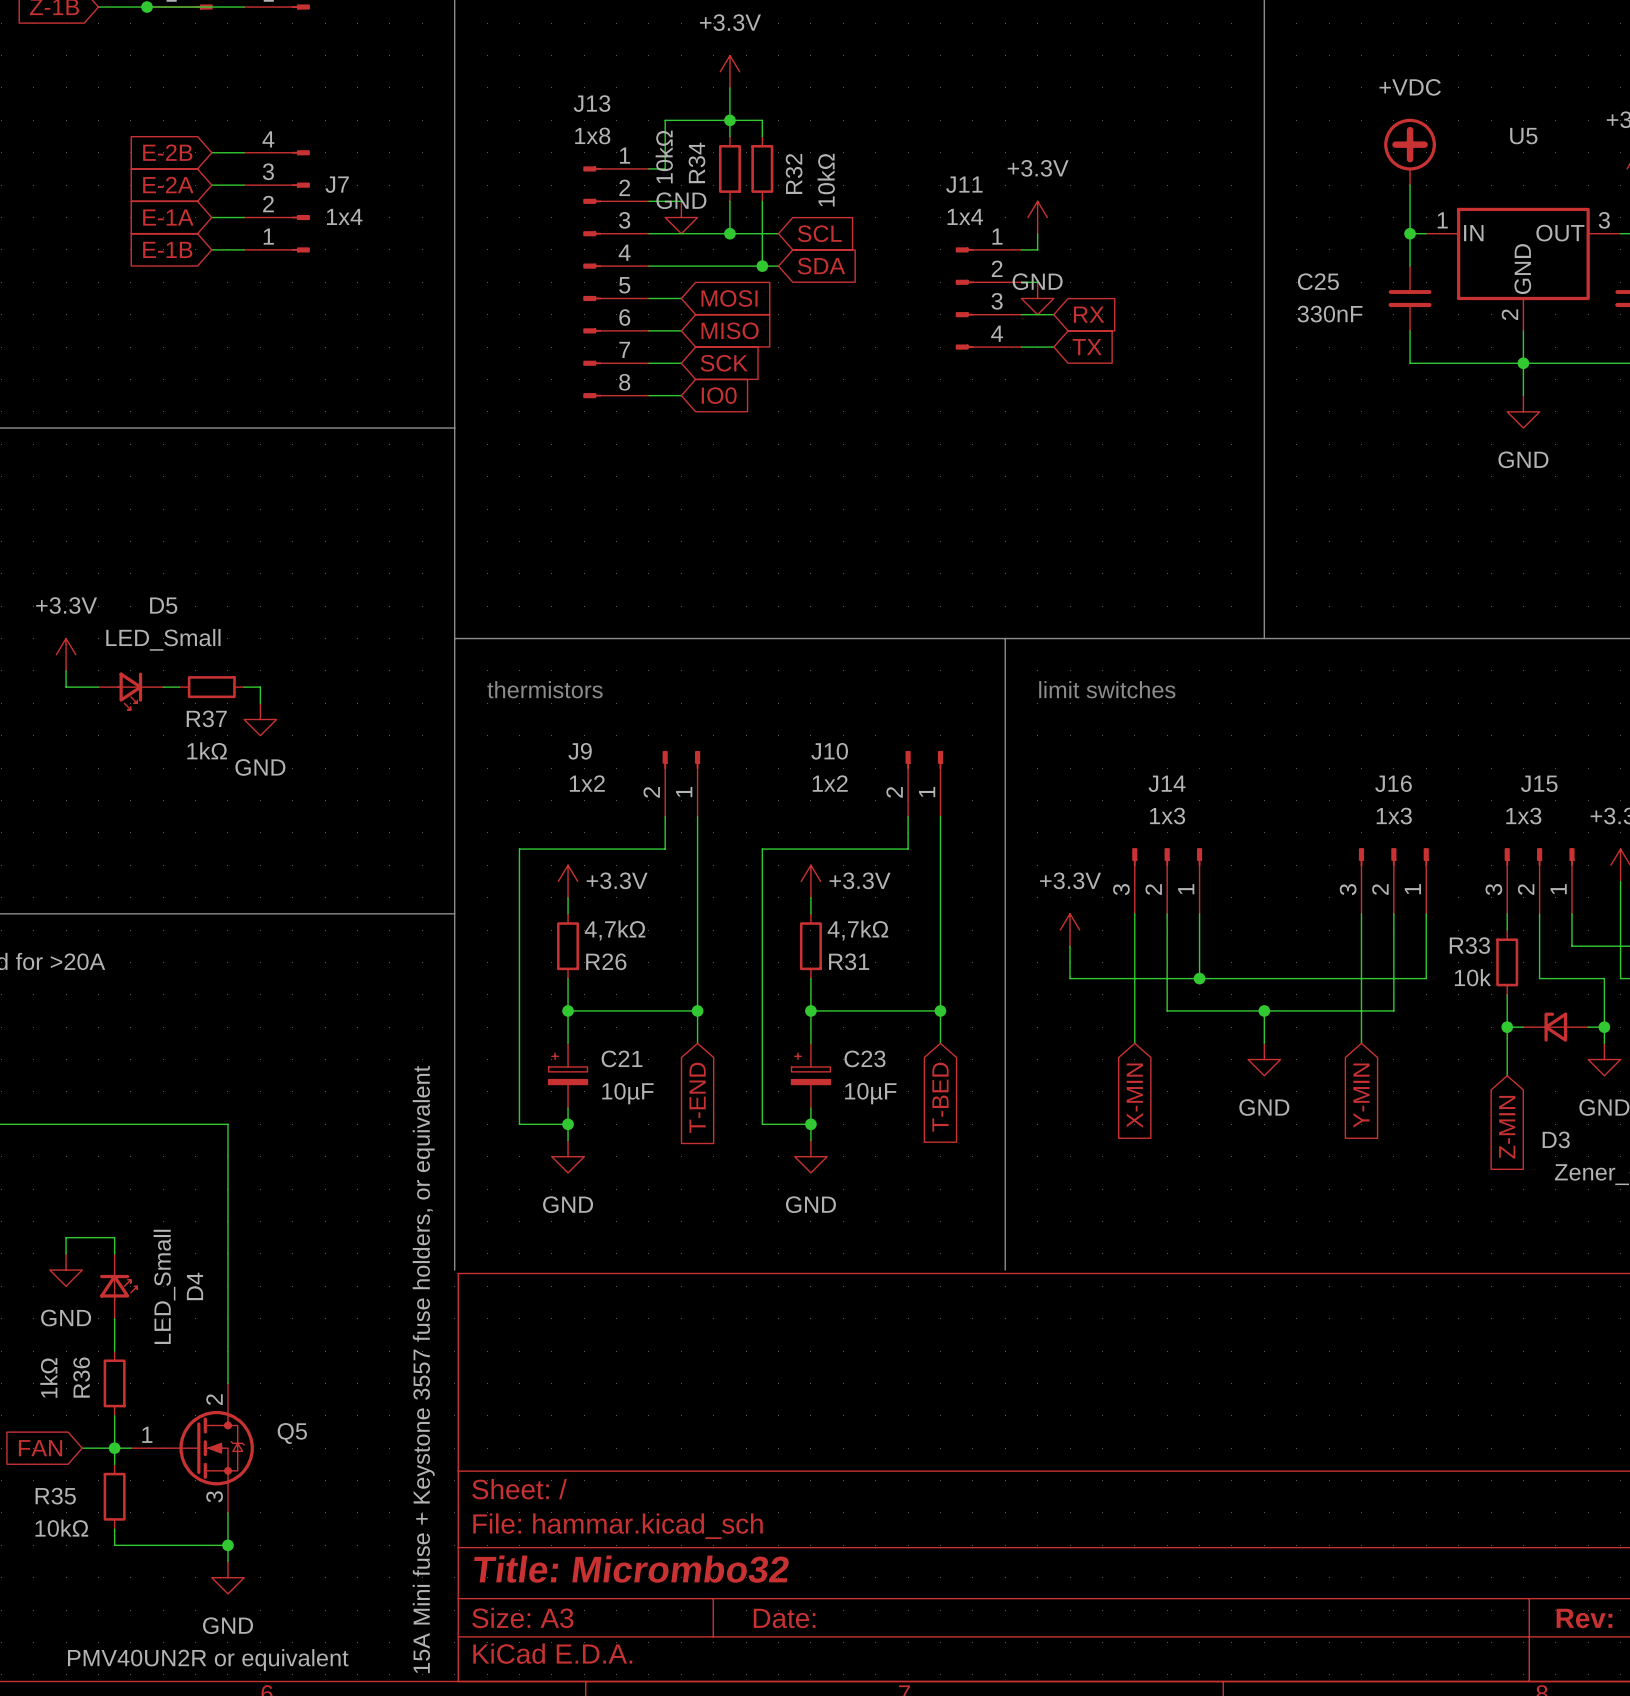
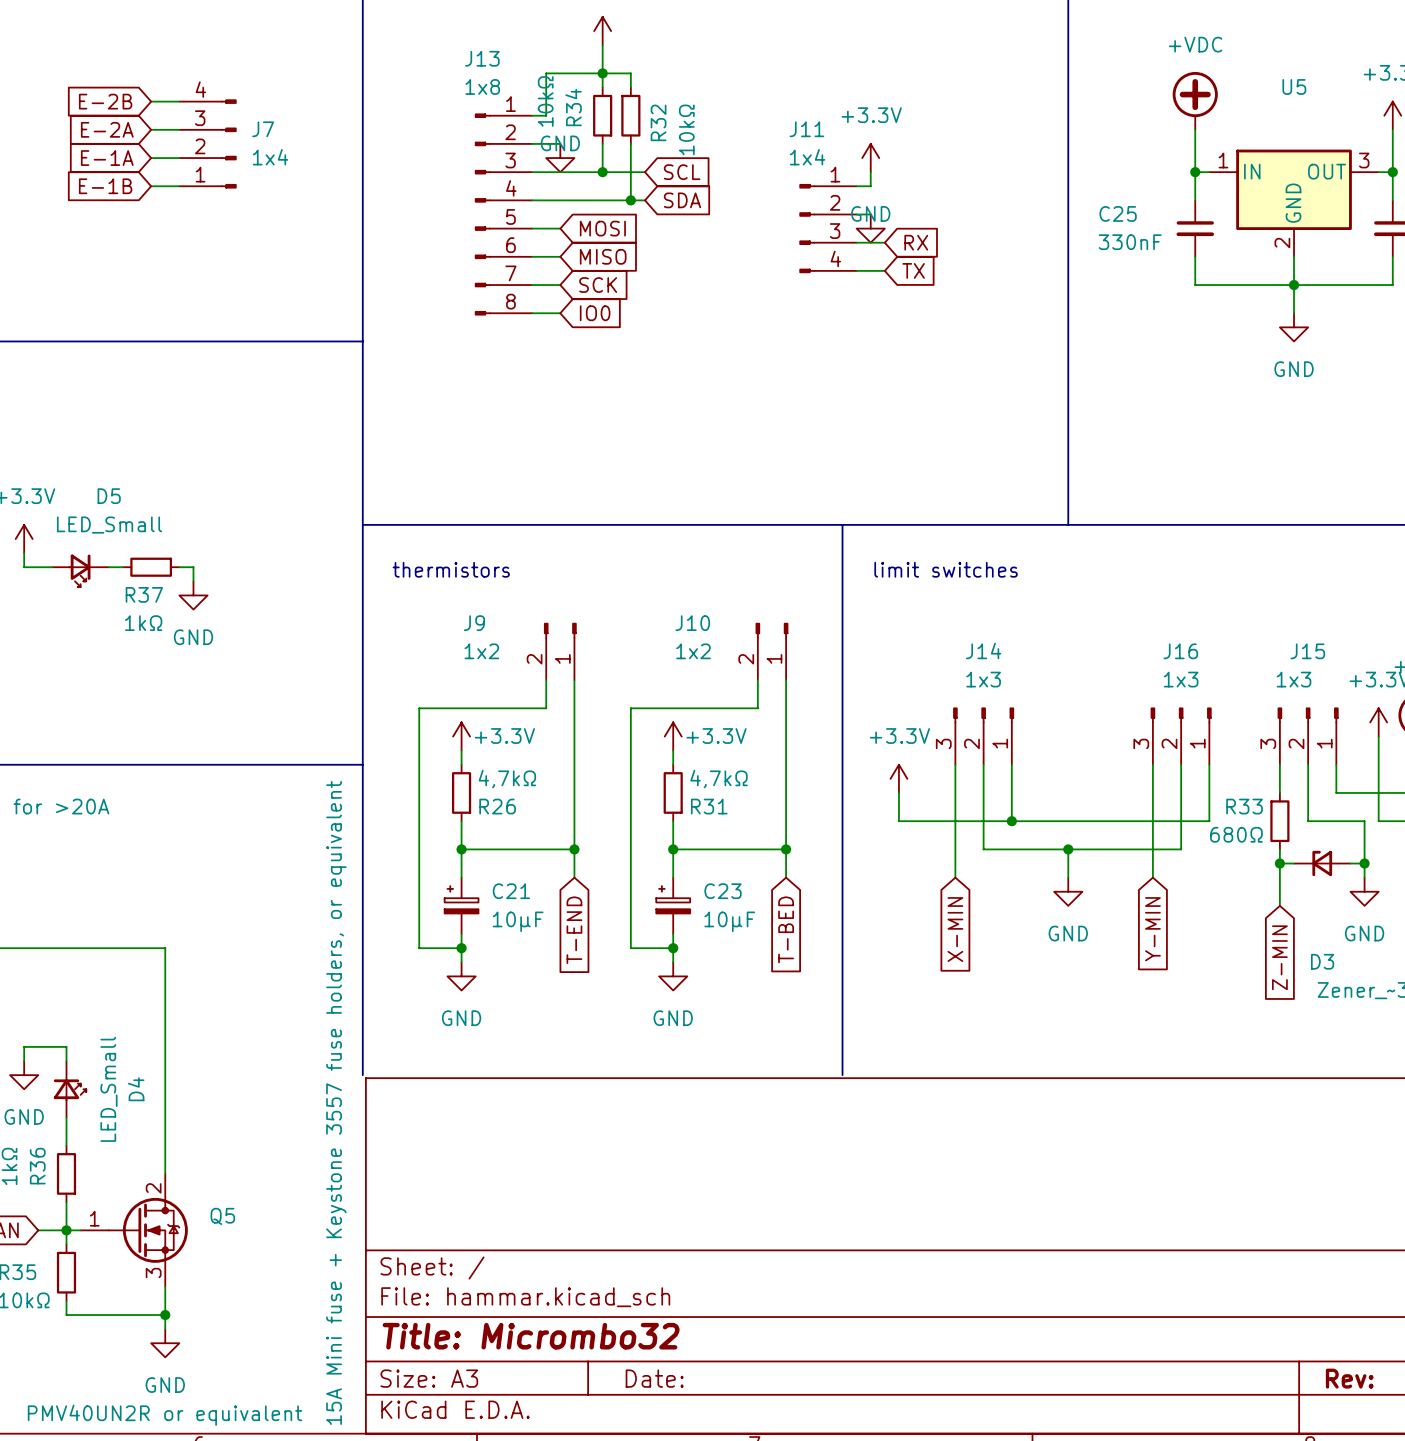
R33 position: (1507, 962) -> (1279, 821)
R33 value: 10k (1472, 977) -> 680Ω (1236, 834)

